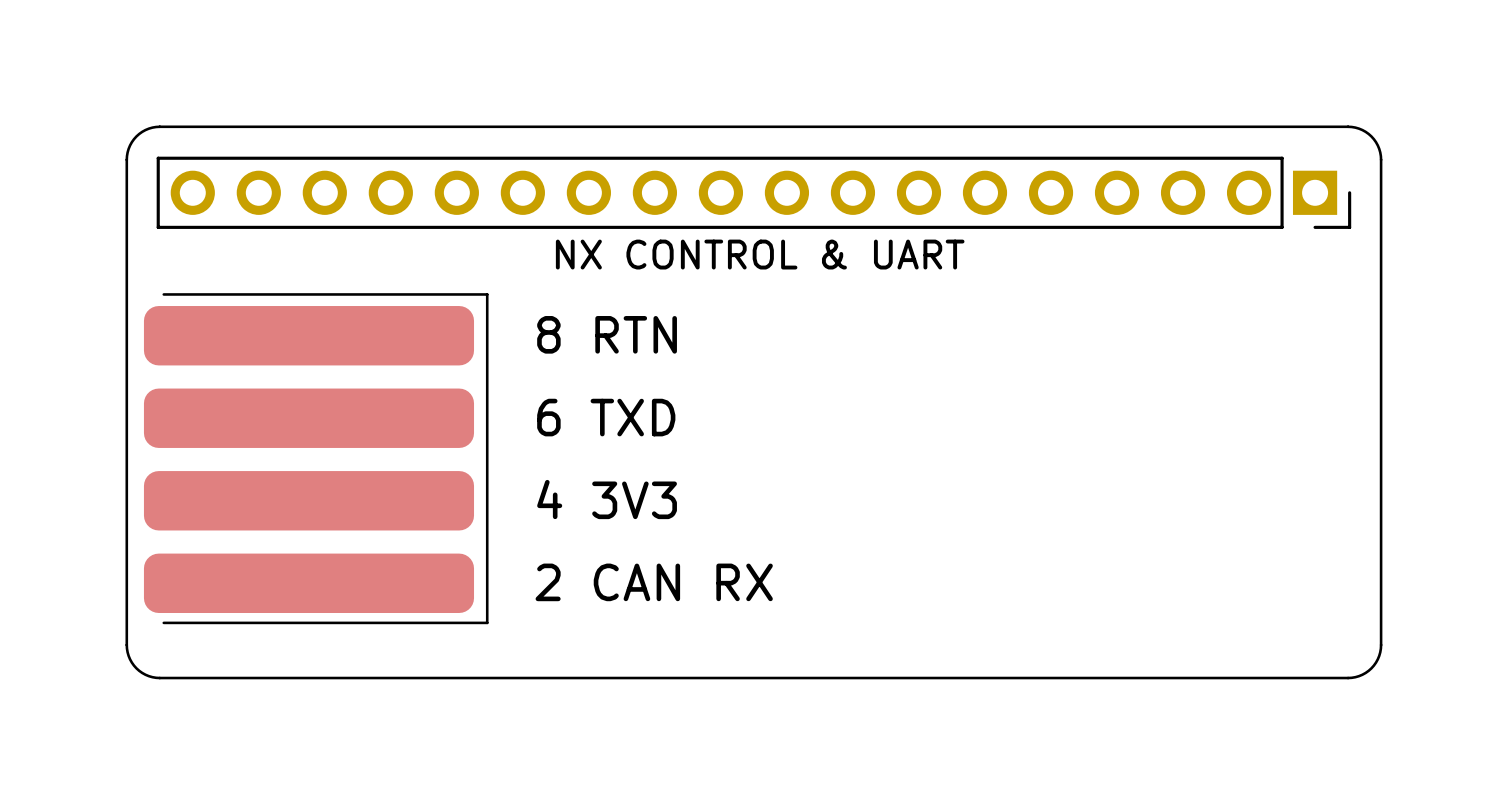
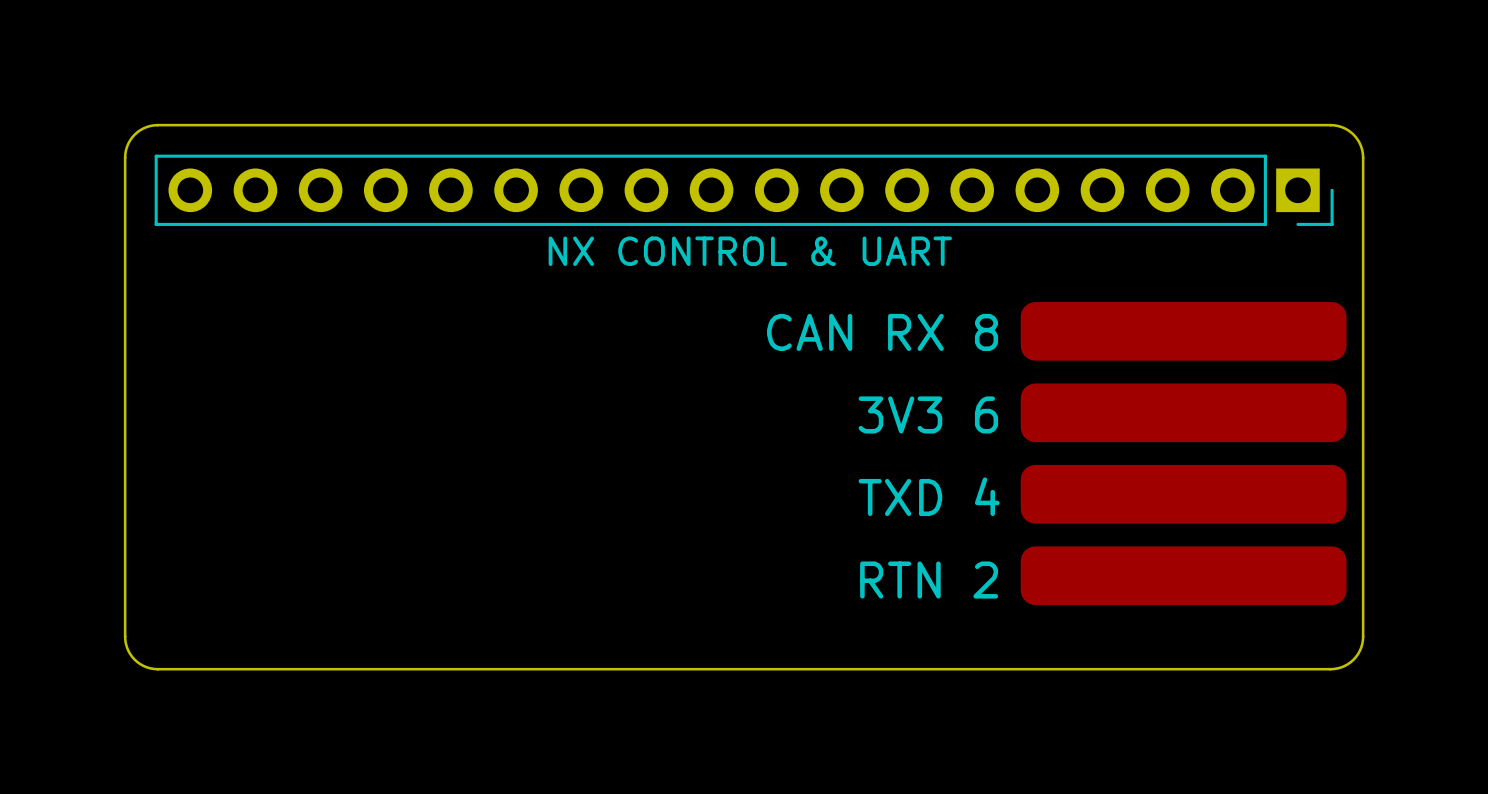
text: 8 RTN (607, 334) -> none
text: none -> CAN RX 8 (882, 332)
text: 6 TXD (606, 417) -> none
text: none -> 3V3 6 (928, 414)
part: (316, 458) -> none
part: none -> (1183, 453)
text: 4 3V3 (607, 499) -> none
text: none -> TXD 4 (929, 496)
text: 2 CAN RX (654, 582) -> none
text: none -> RTN 2 (929, 580)

